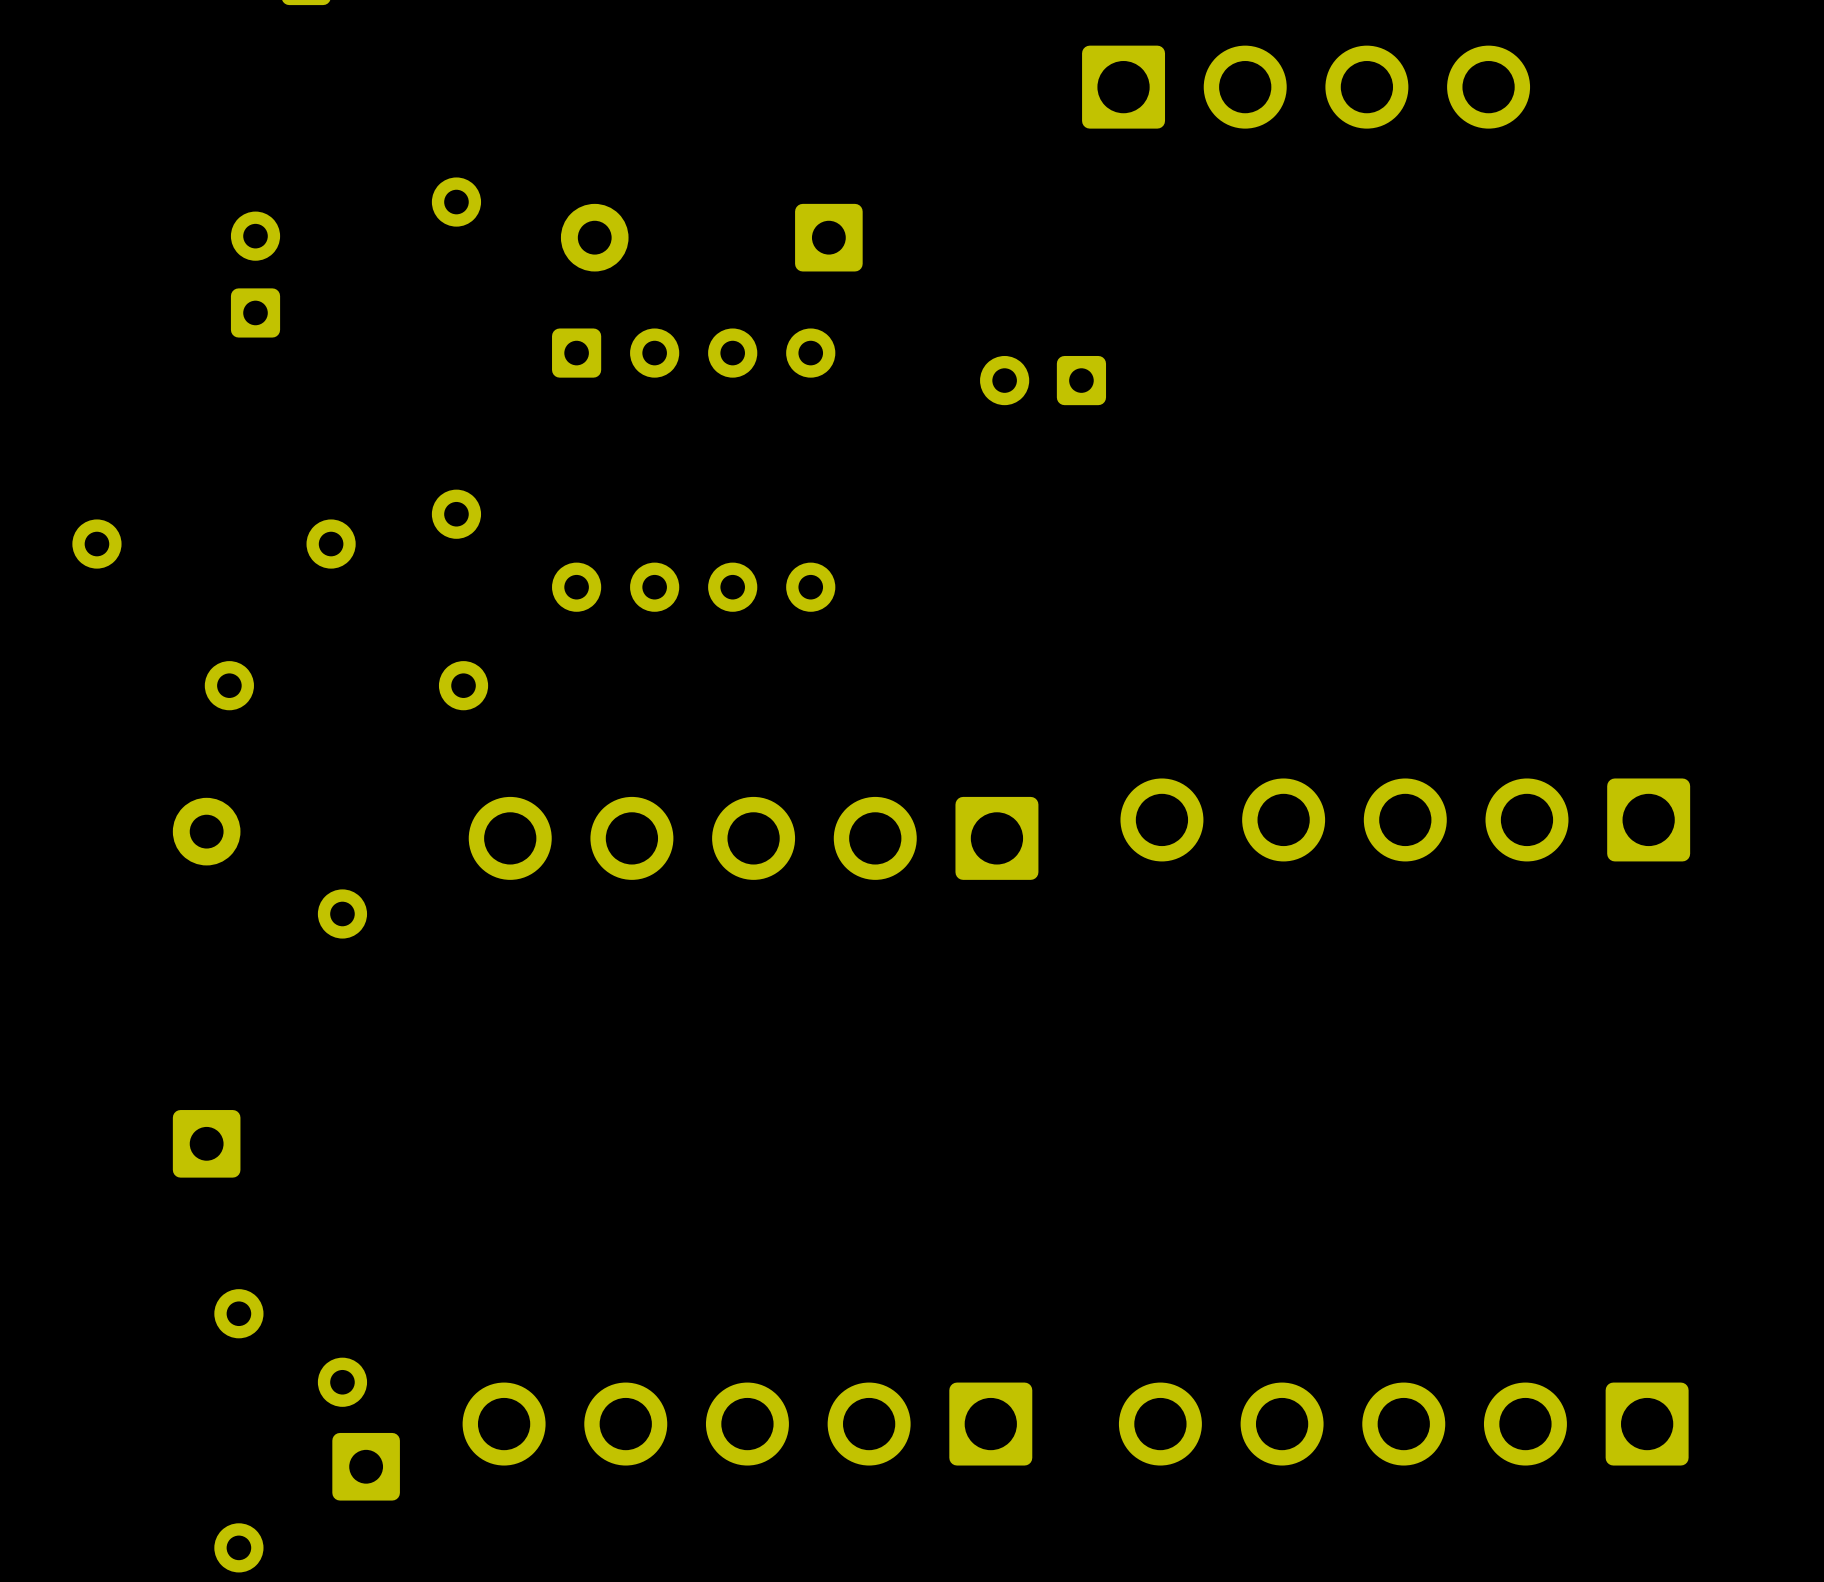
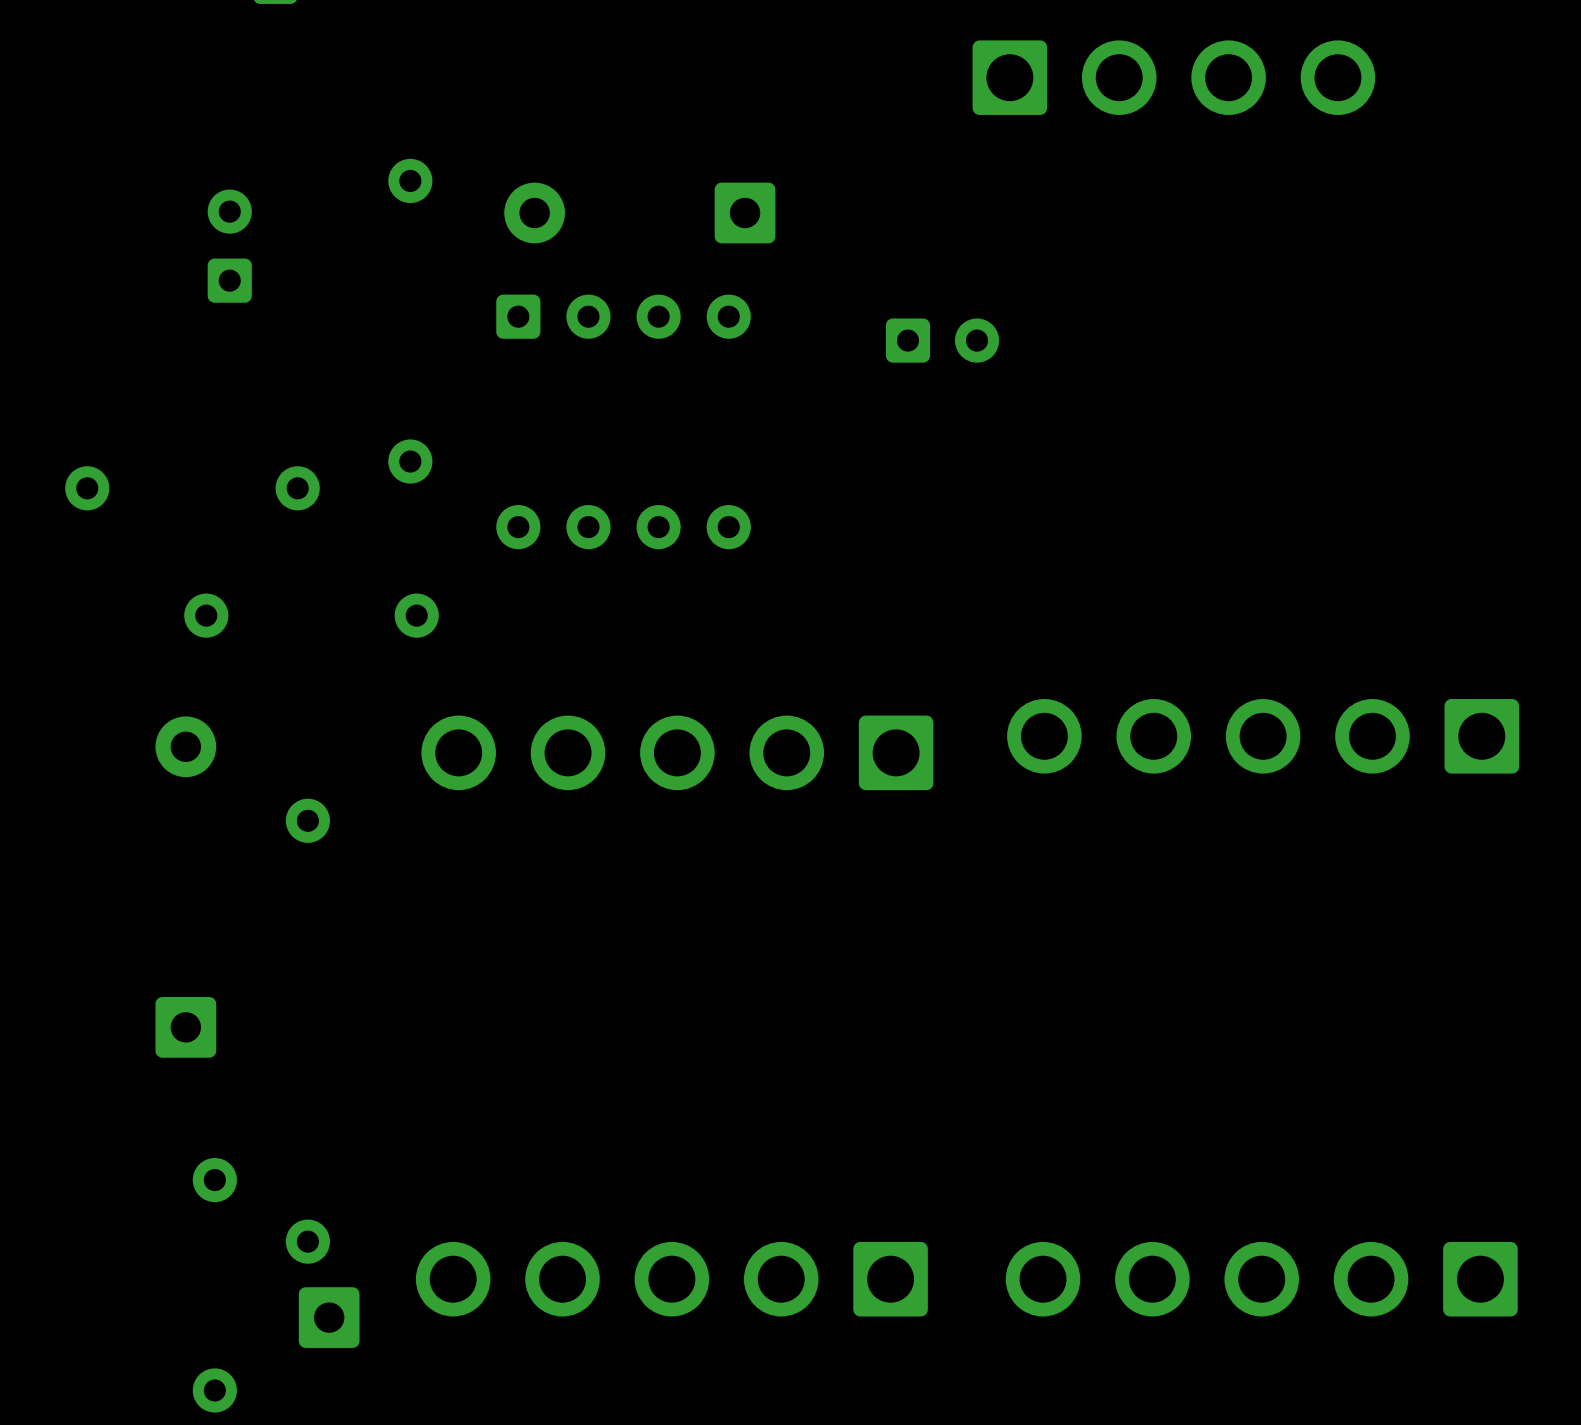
part rotation: 0° (1043, 380) -> 180° (942, 340)

